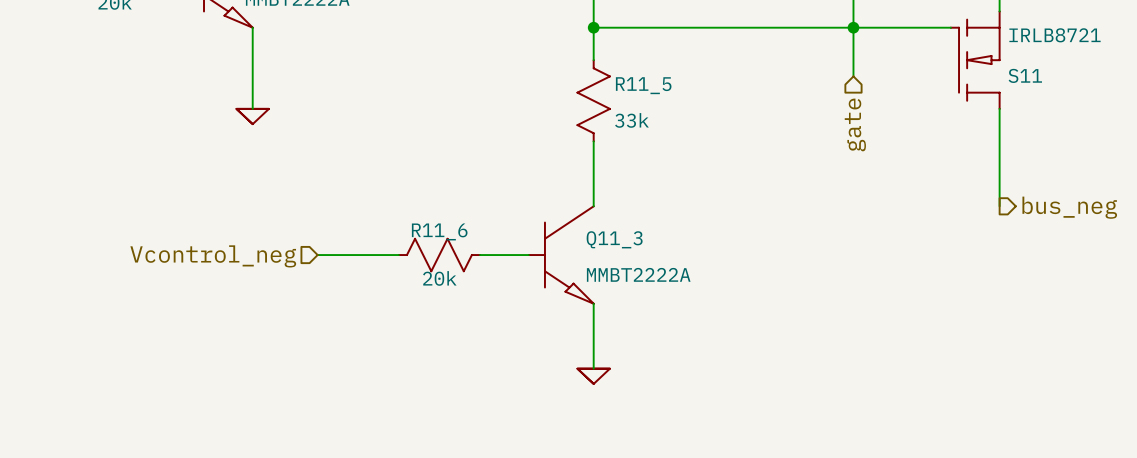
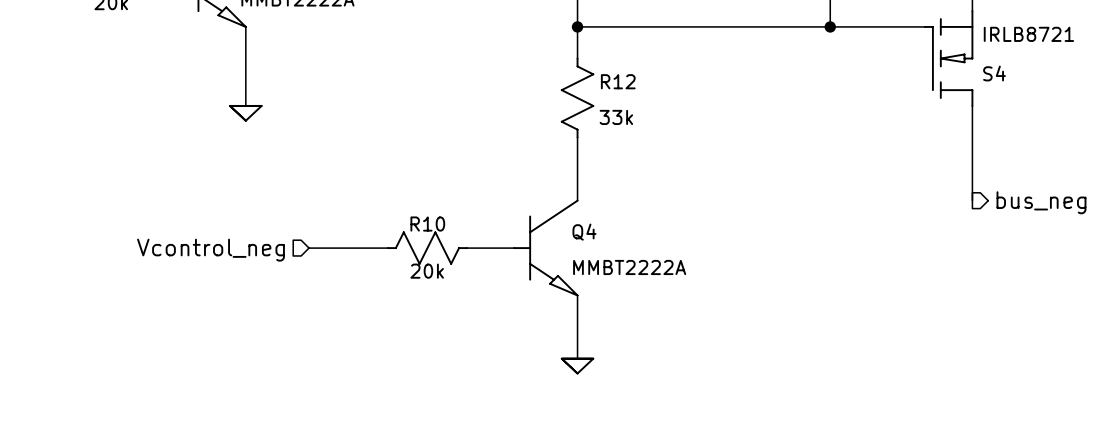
wire: (853, 27) (853, 76) -> none
S11 name: S11 (1025, 75) -> S4 (994, 73)
R11_5 name: R11_5 (643, 85) -> R12 (618, 81)
hierarchical label: gate (855, 124) -> none
R11_6 name: R11_6 (439, 231) -> R10 (427, 224)
Q11_3 name: Q11_3 (614, 239) -> Q4 (584, 232)

